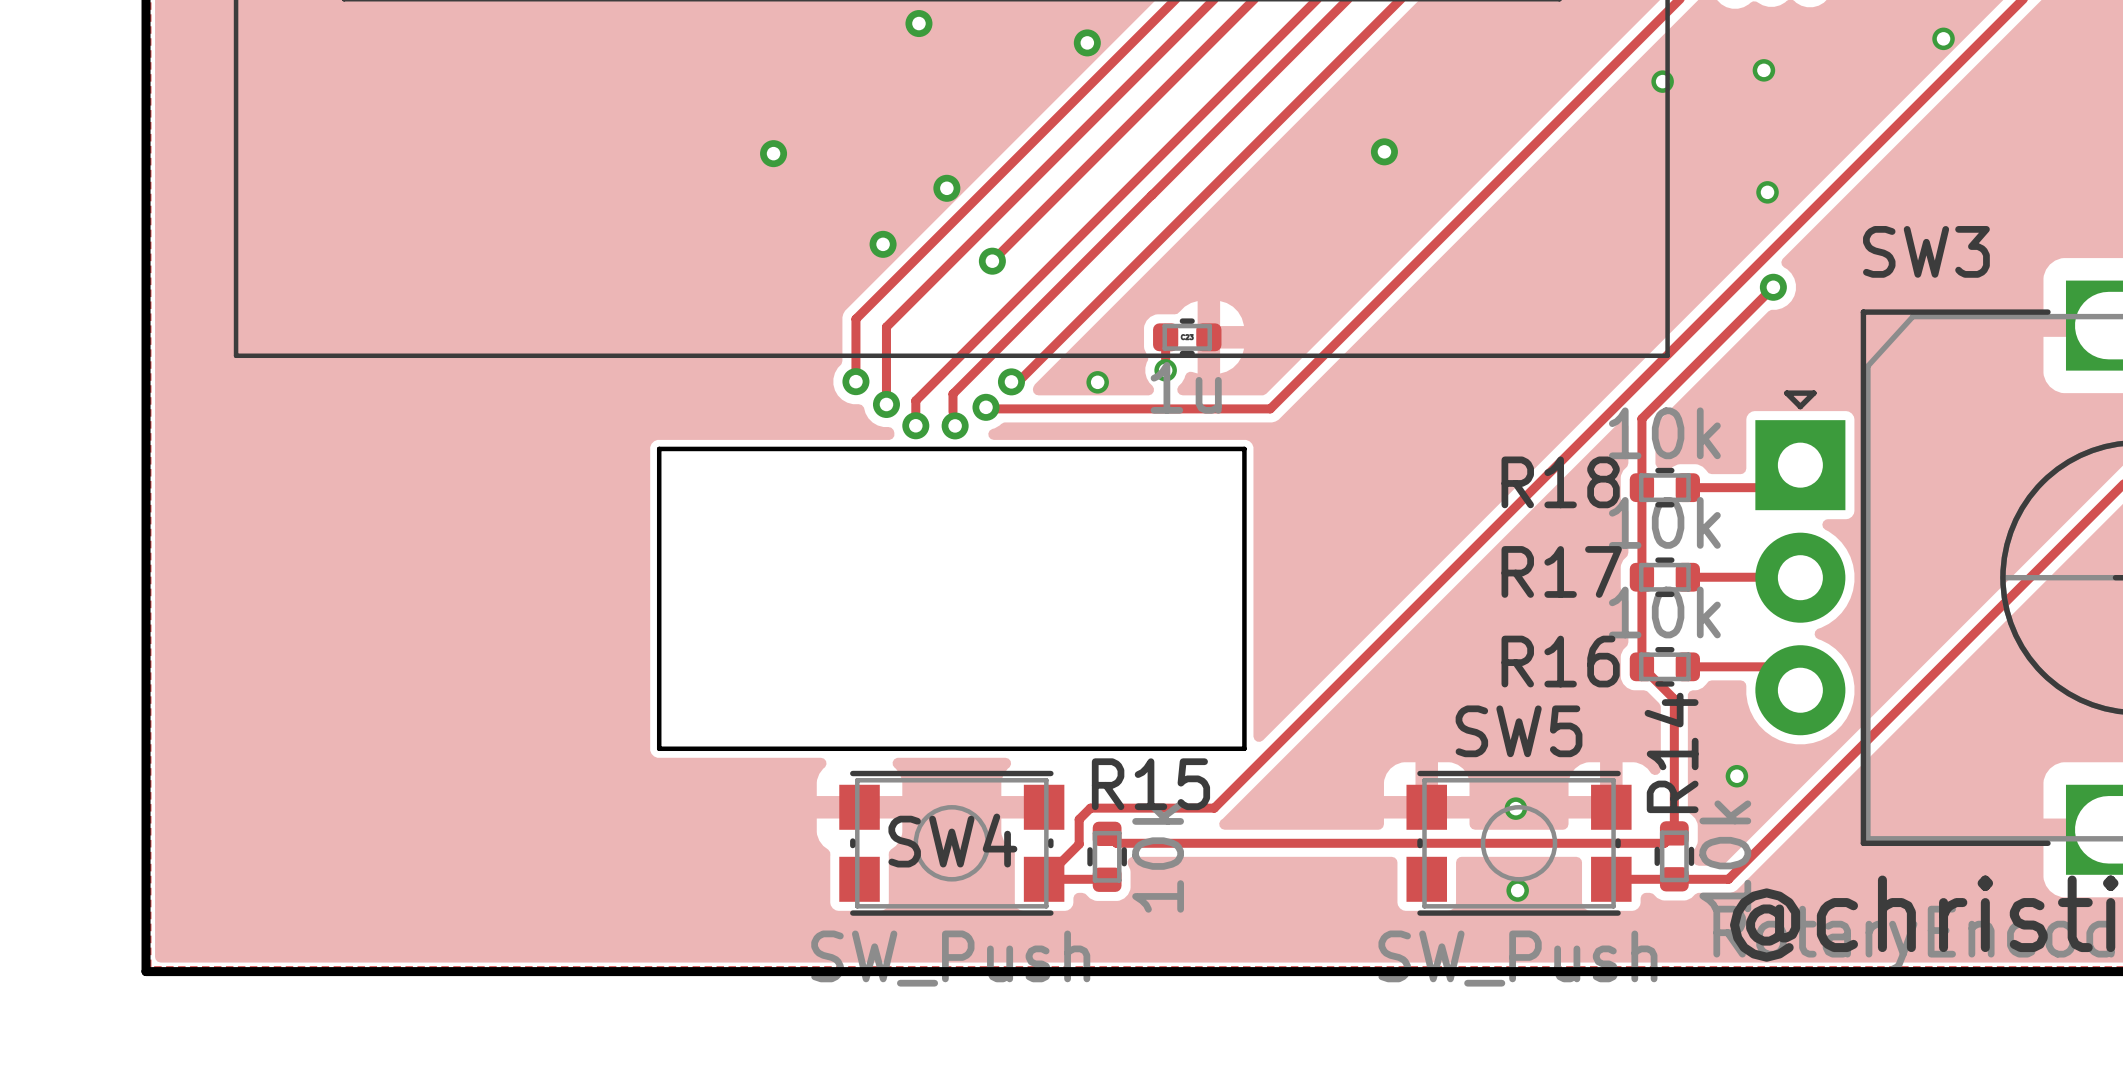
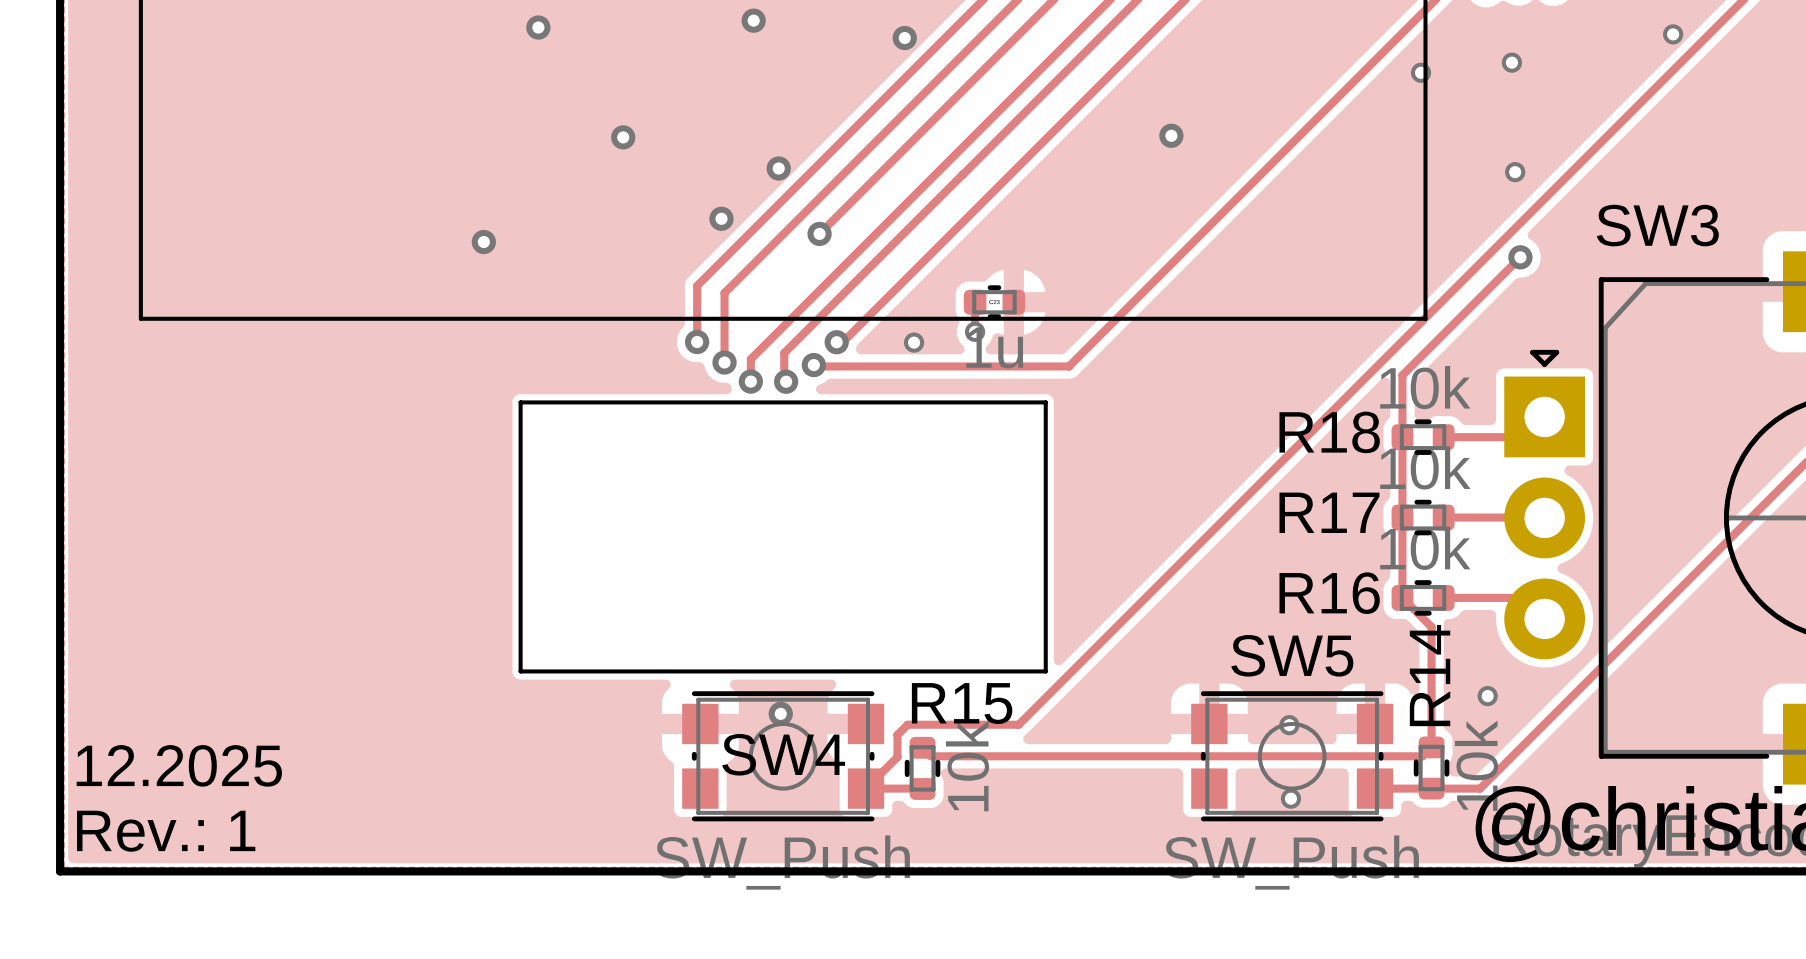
via: none -> (538, 27)
via: none -> (483, 242)
via: none -> (780, 713)
text: none -> 12.2025 (179, 765)
text: none -> Rev.: 1 (166, 831)

